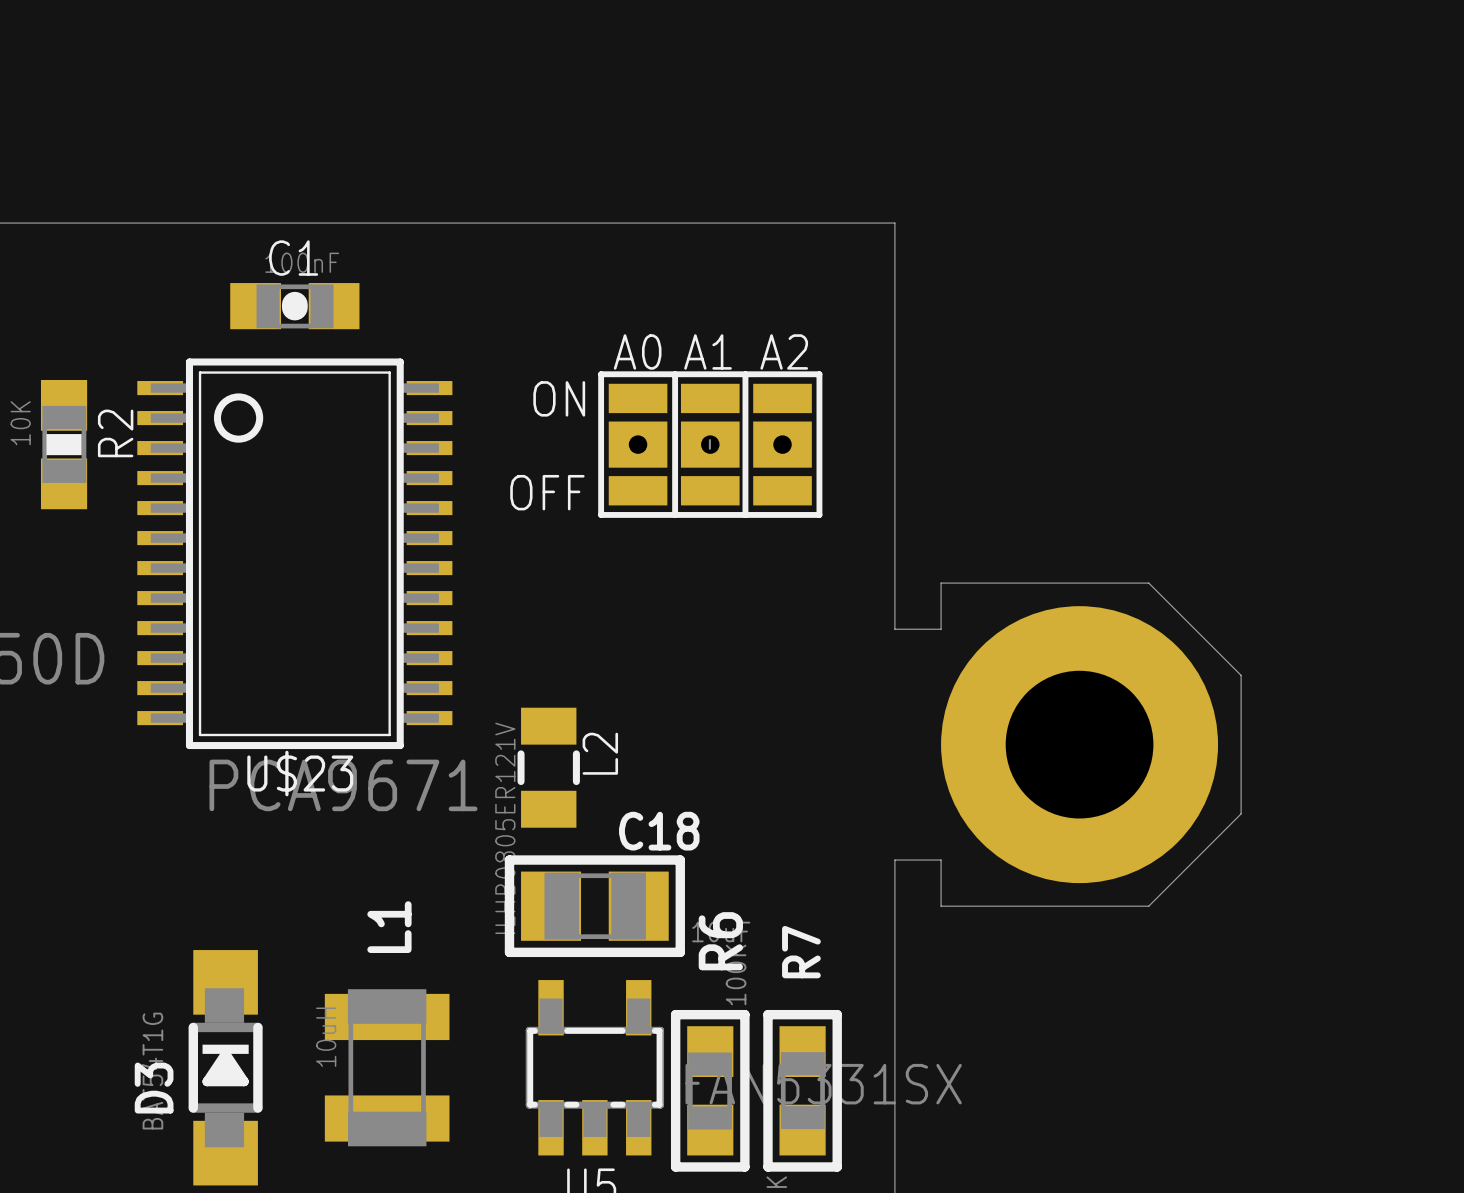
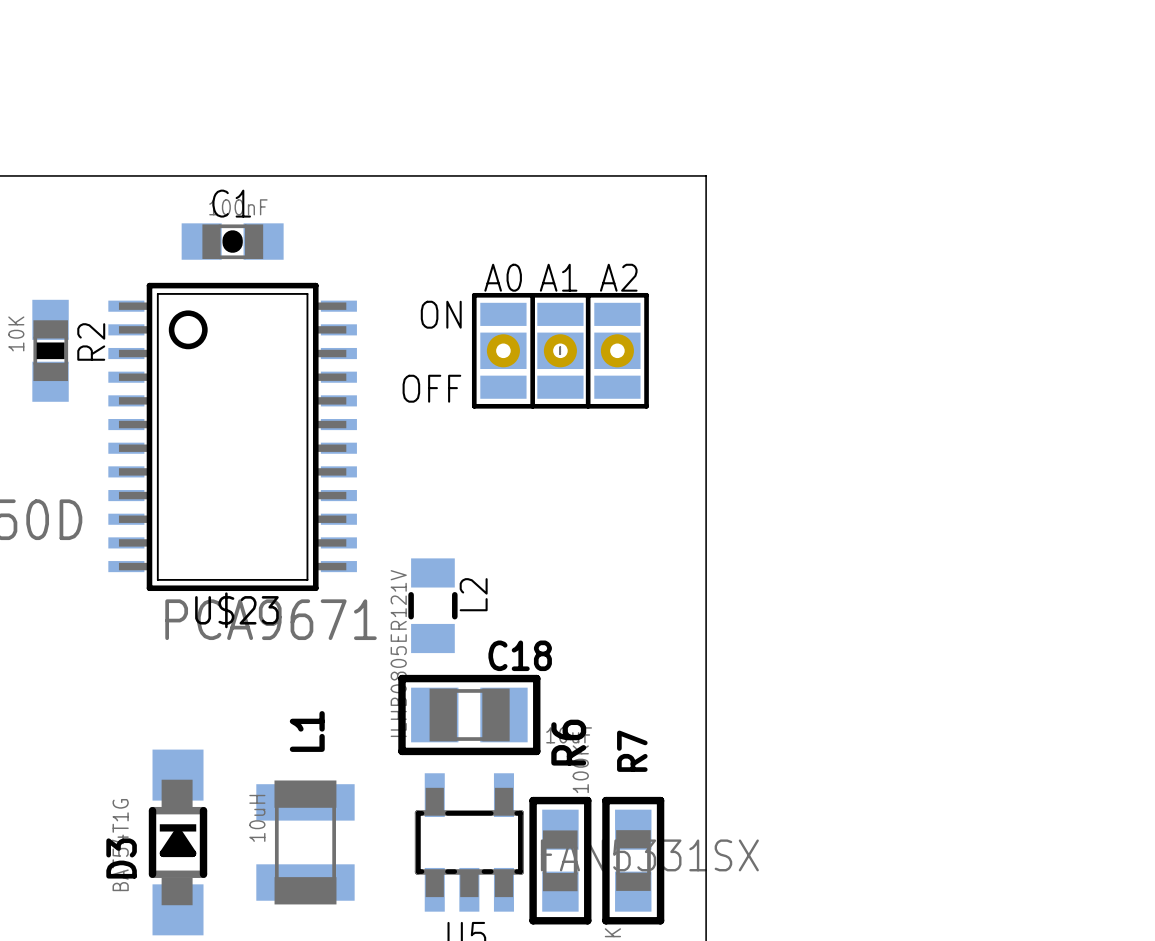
board edge: (894, 629) (941, 629) (941, 583) (1148, 583) (1241, 675) (1241, 813) (1148, 906) (941, 906) (941, 860) (894, 860) -> (706, 496) (706, 678)
part: (1079, 744) -> none

